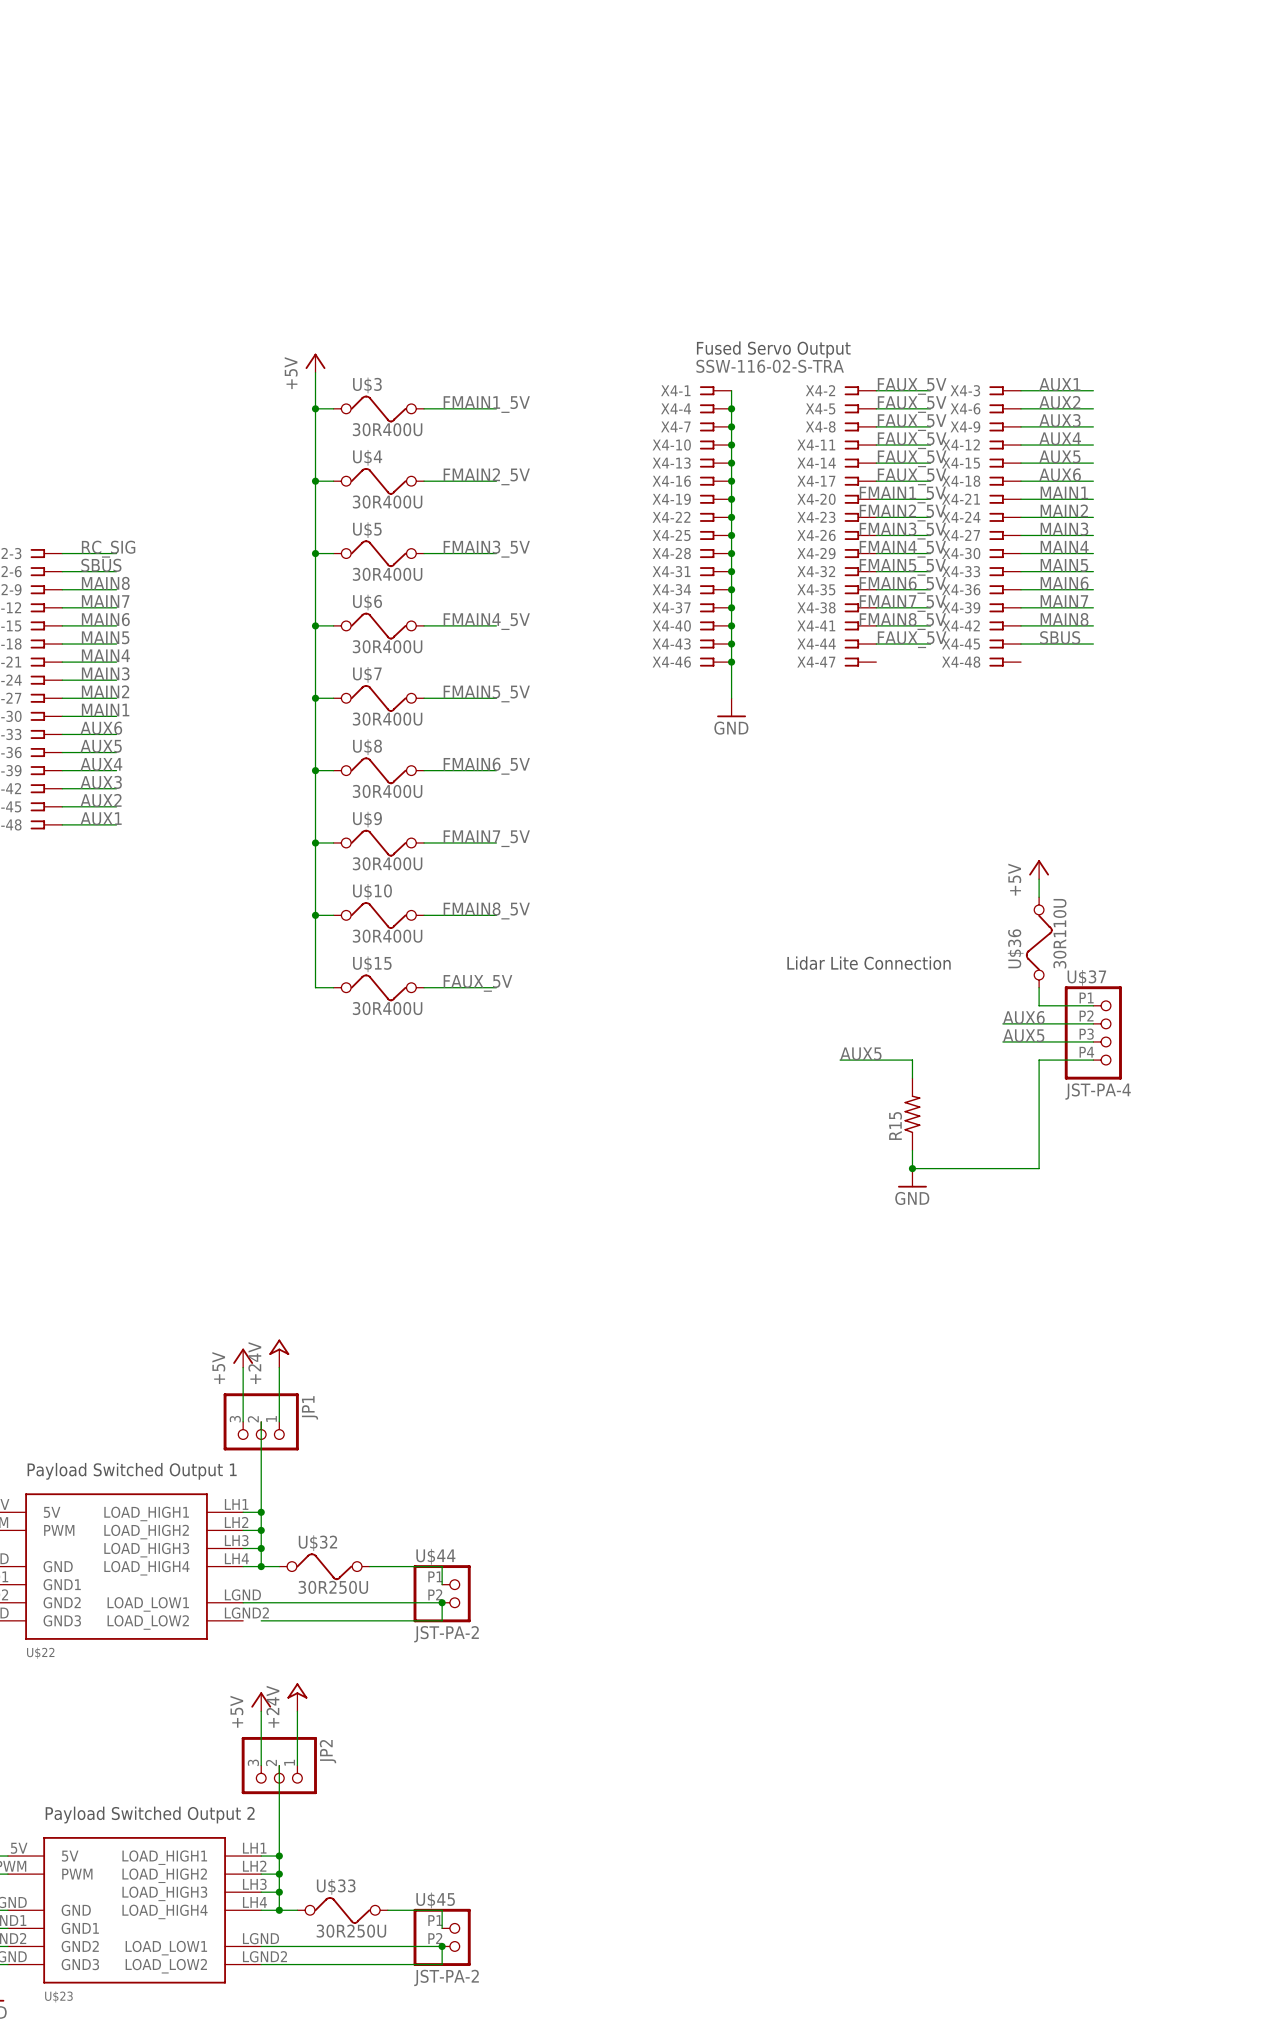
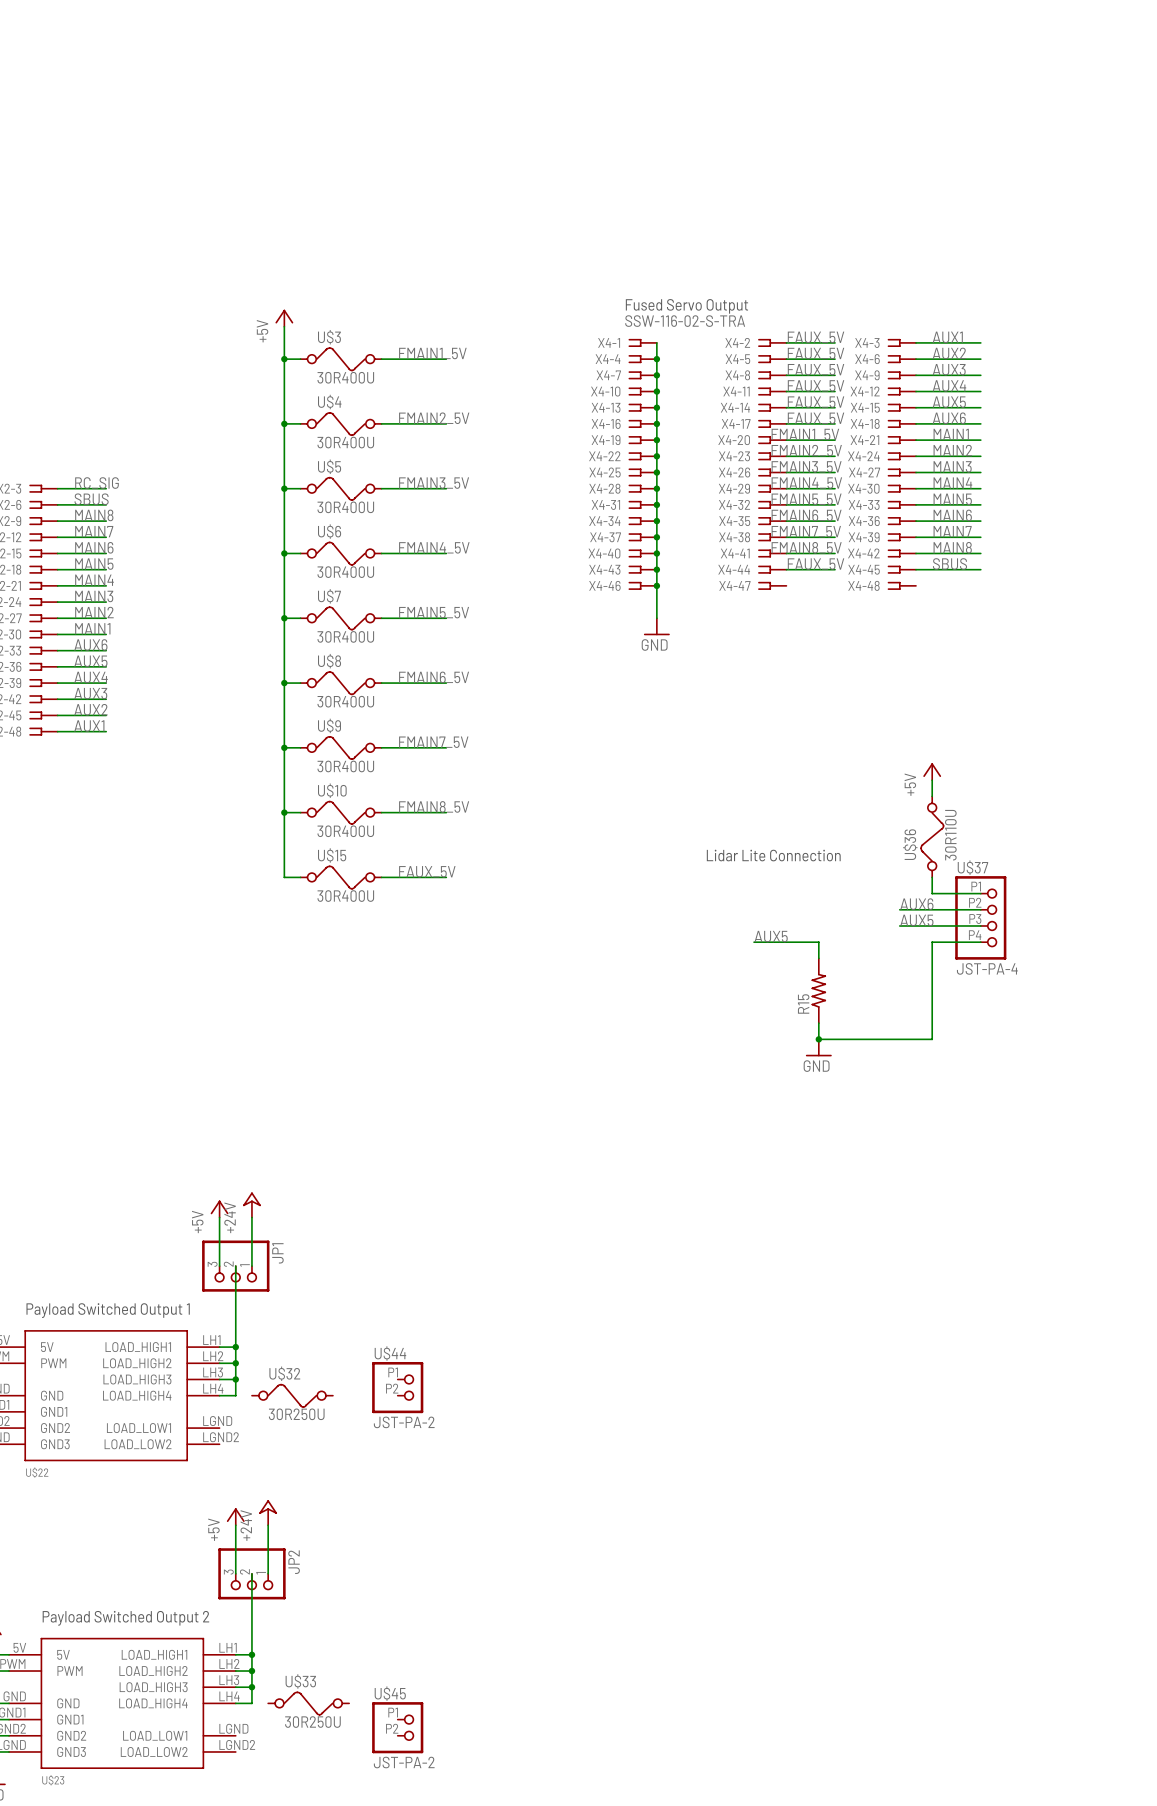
wire: (261, 1566) (279, 1566) -> none
junction: (261, 1566) -> none
wire: (369, 1566) (442, 1566) (442, 1584) -> none
U$44 position: (442, 1593) -> (397, 1387)
wire: (243, 1602) (442, 1602) (442, 1620) (261, 1620) -> none
junction: (442, 1602) -> none
wire: (279, 1910) (297, 1910) -> none
junction: (279, 1910) -> none
wire: (387, 1910) (442, 1910) (442, 1928) -> none
wire: (261, 1946) (442, 1946) (442, 1964) (261, 1964) -> none
junction: (442, 1946) -> none

